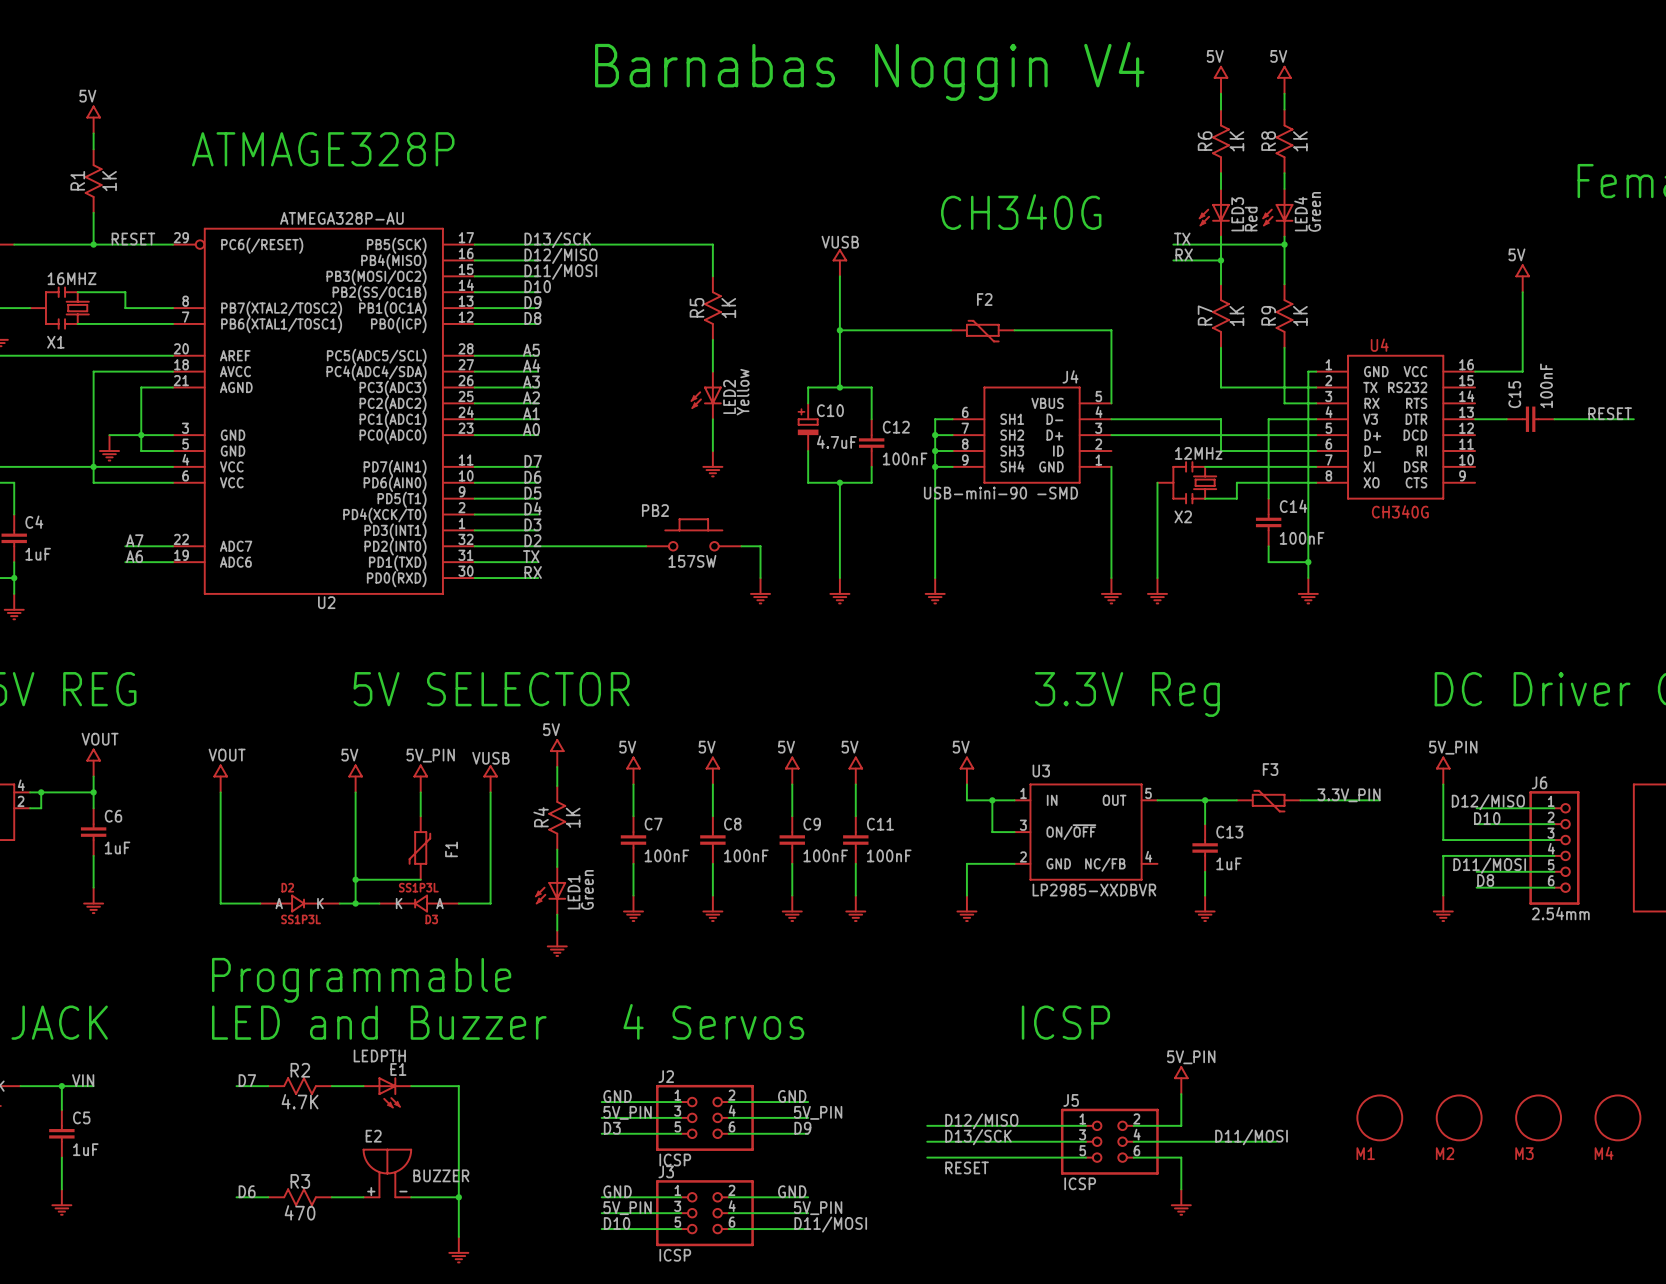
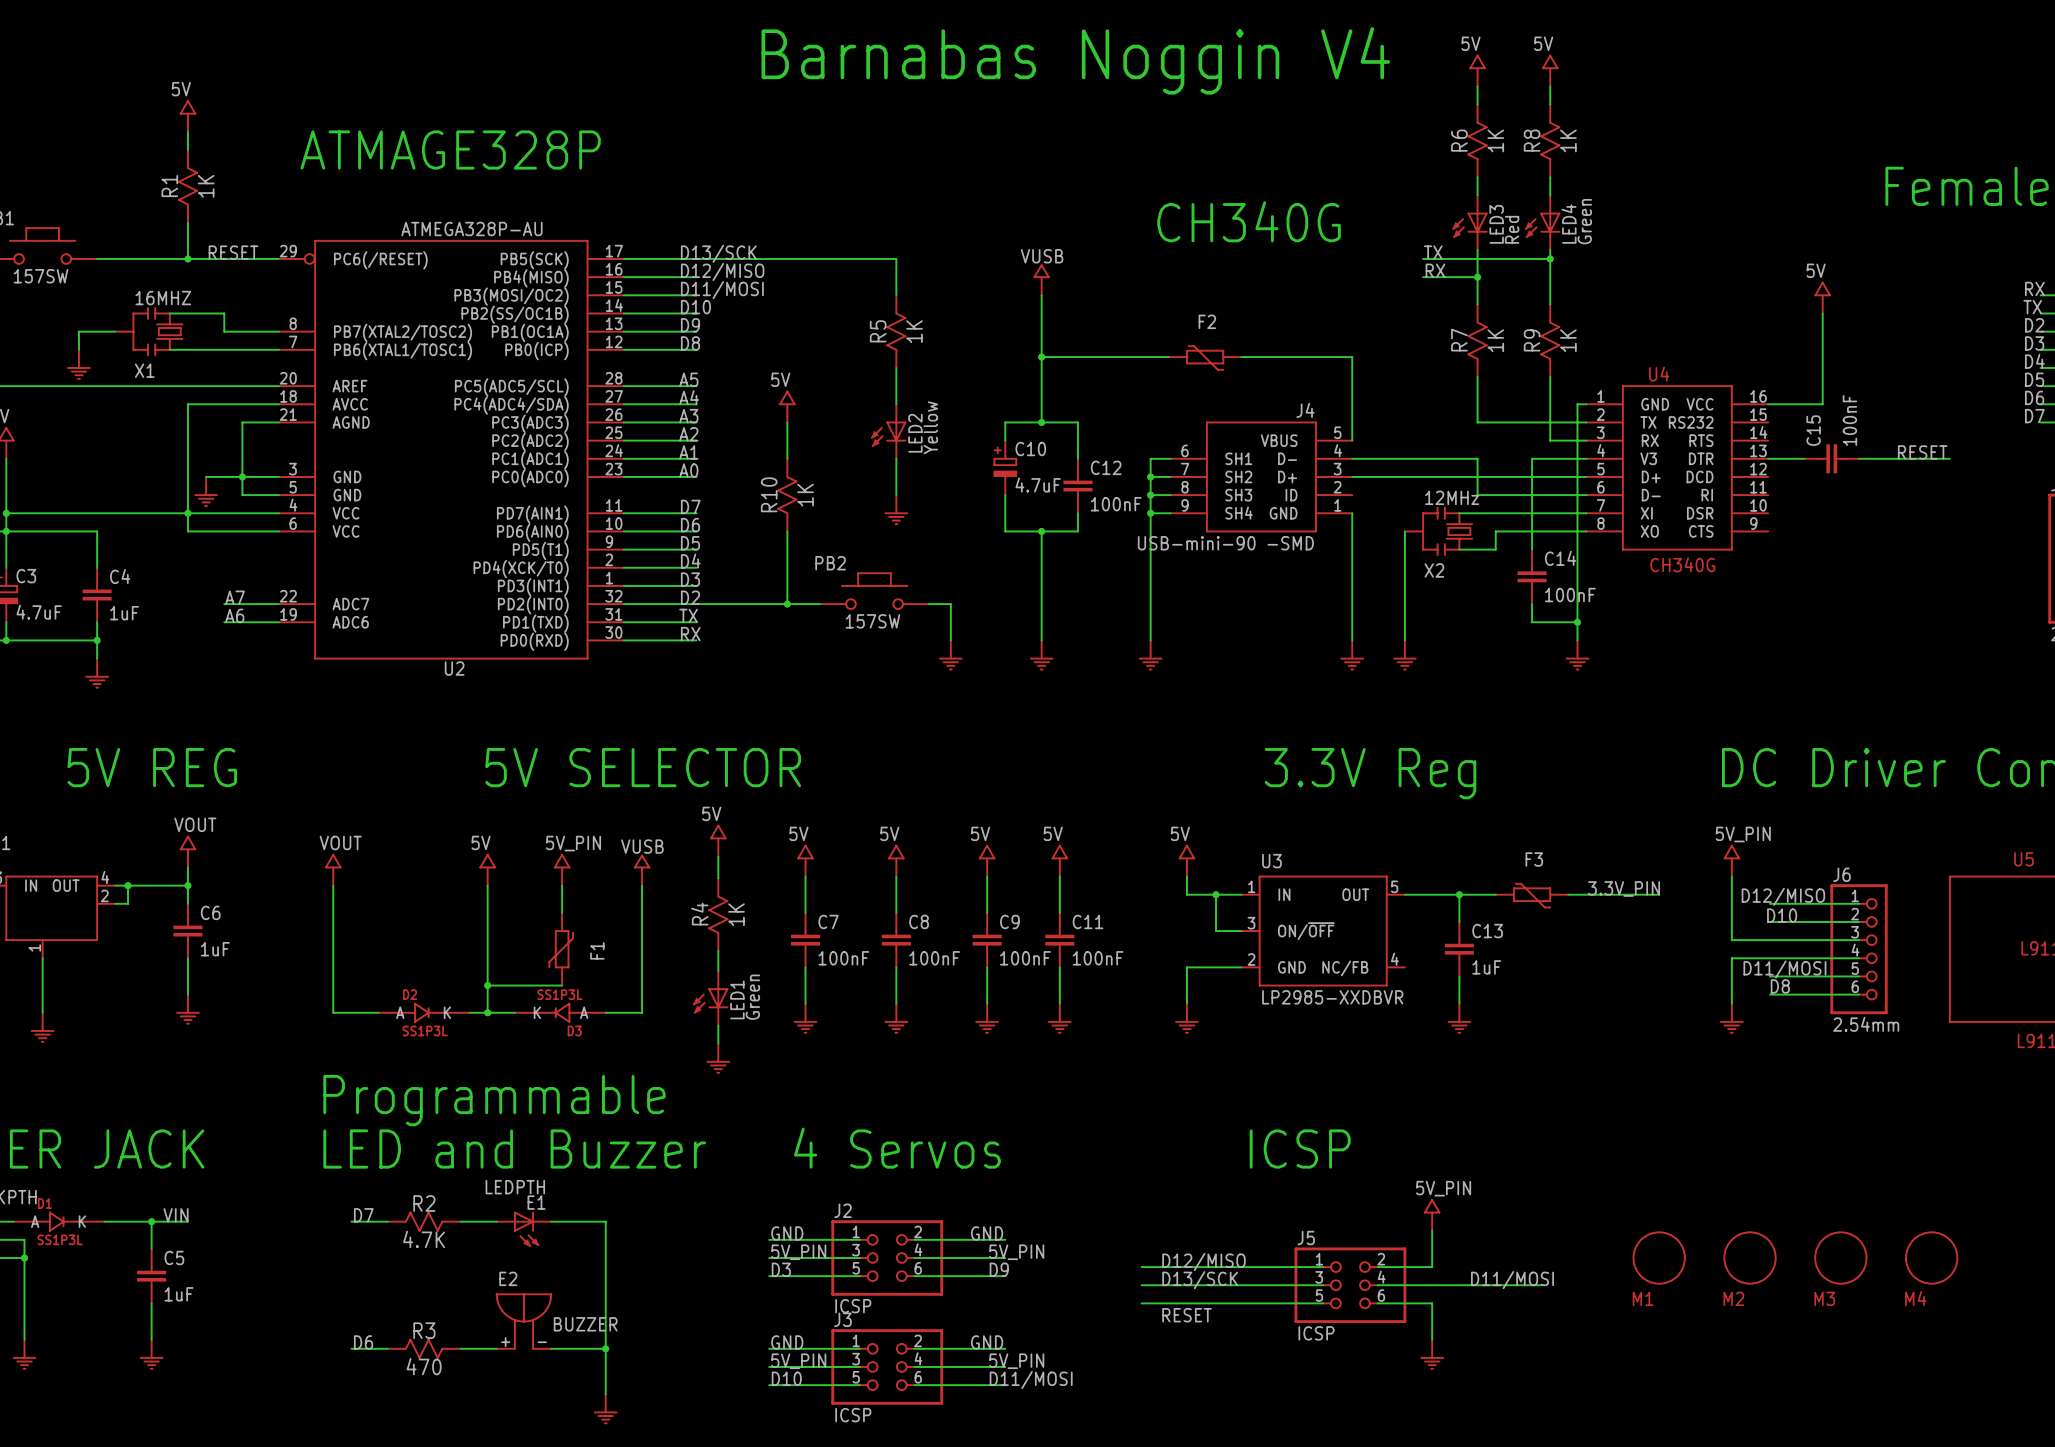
power symbol: none -> 5V (787, 406)
wire: none -> (787, 422) (787, 458)
R10: none -> 1K (787, 495)
wire: none -> (787, 531) (787, 604)
junction: none -> (787, 604)

